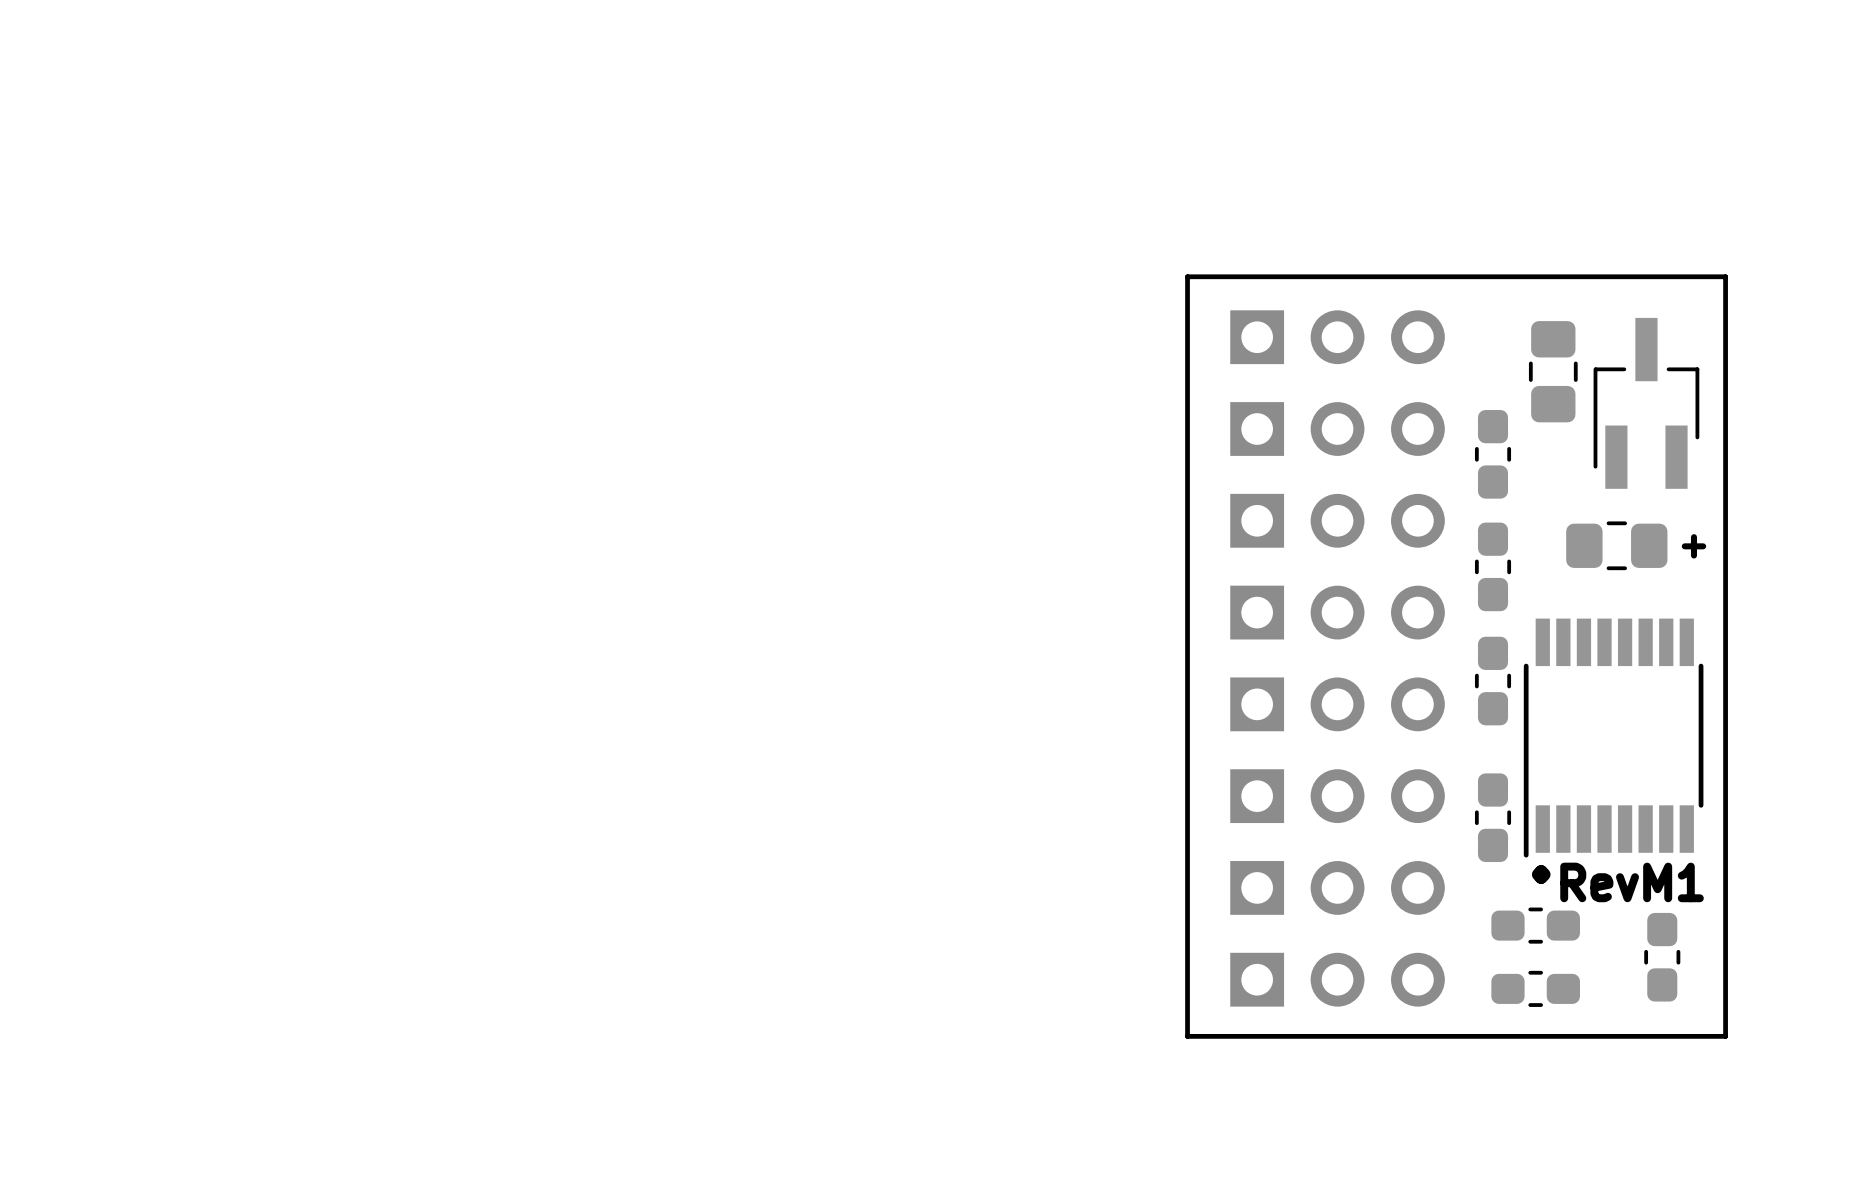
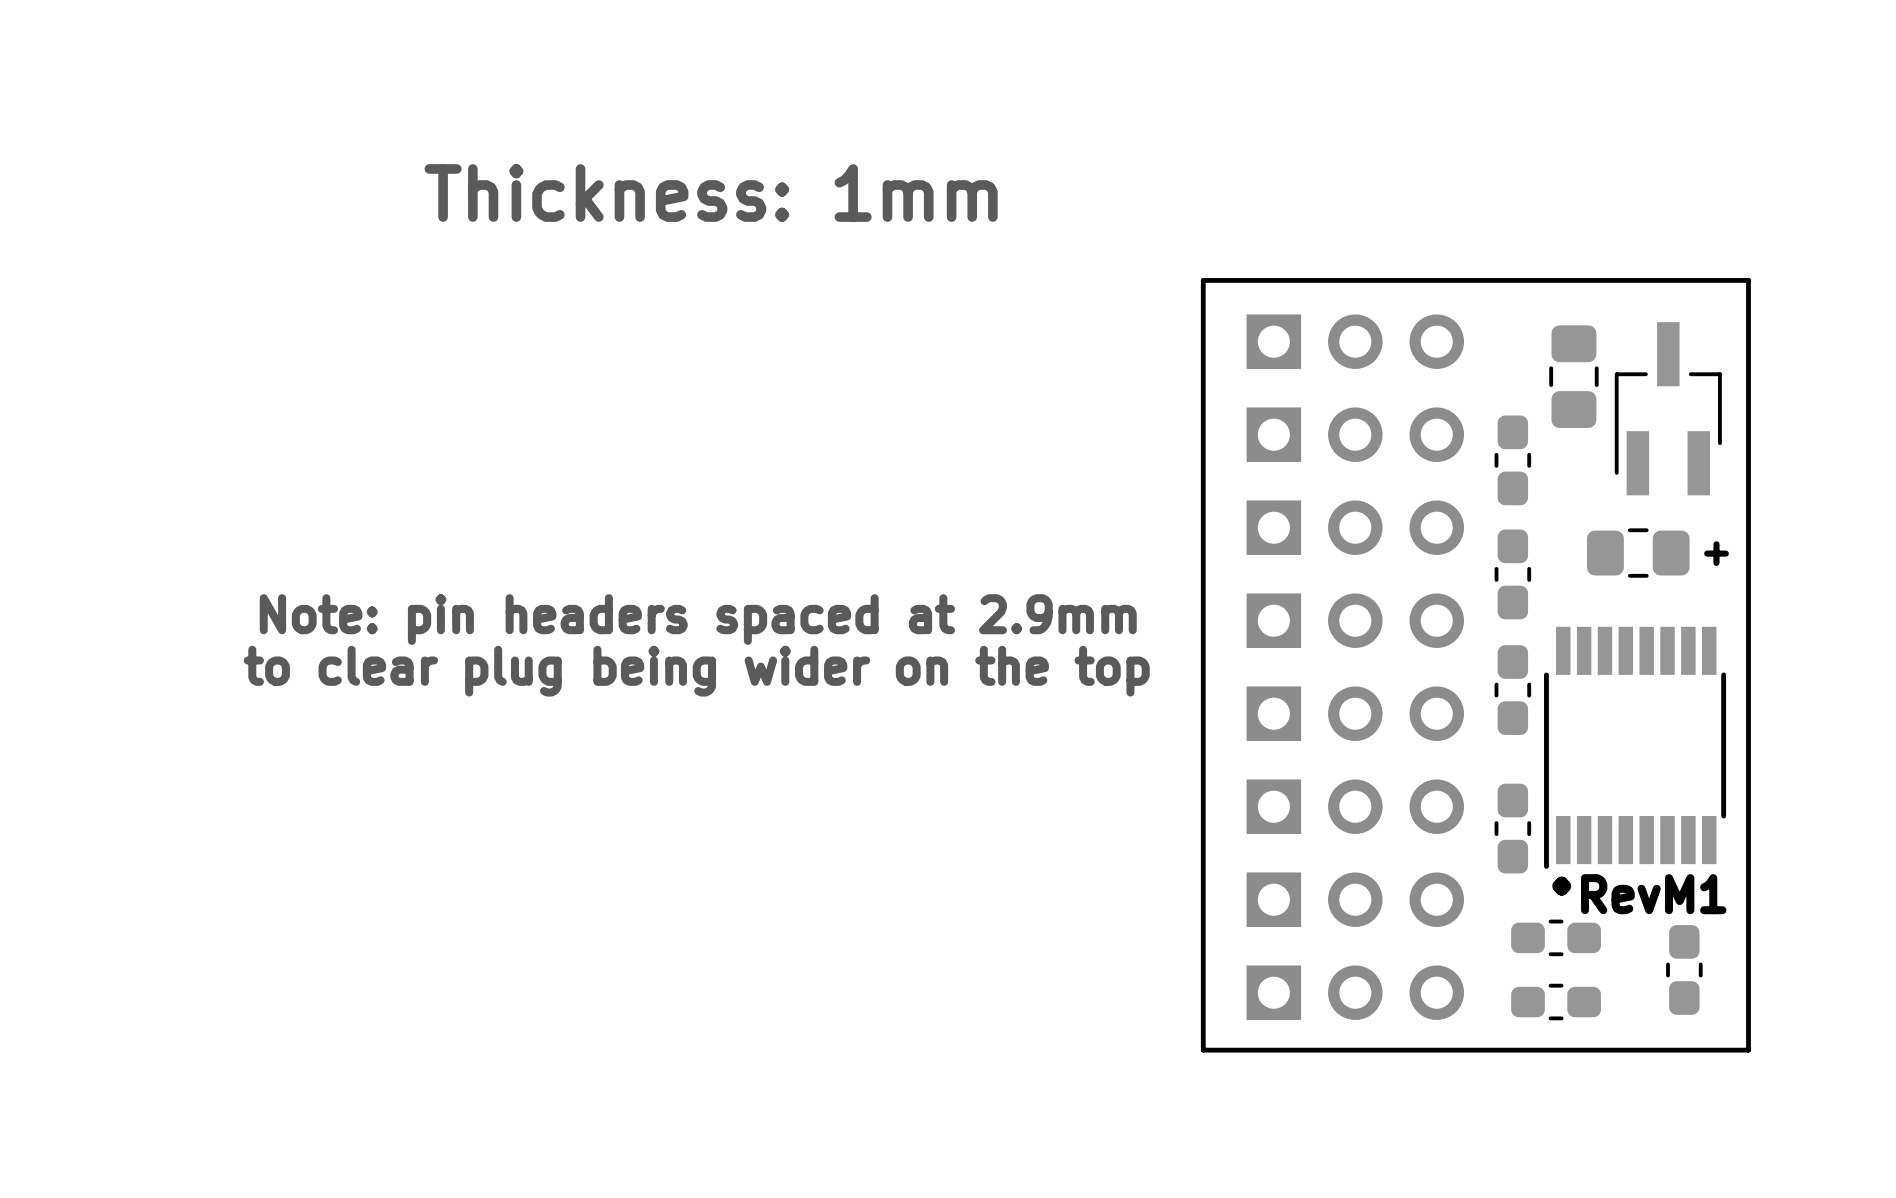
text: none -> Thickness: 1mm (711, 193)
text: none -> Note: pin headers spaced at 2.9mm (698, 619)
text: none -> to clear plug being wider on the top (696, 671)

